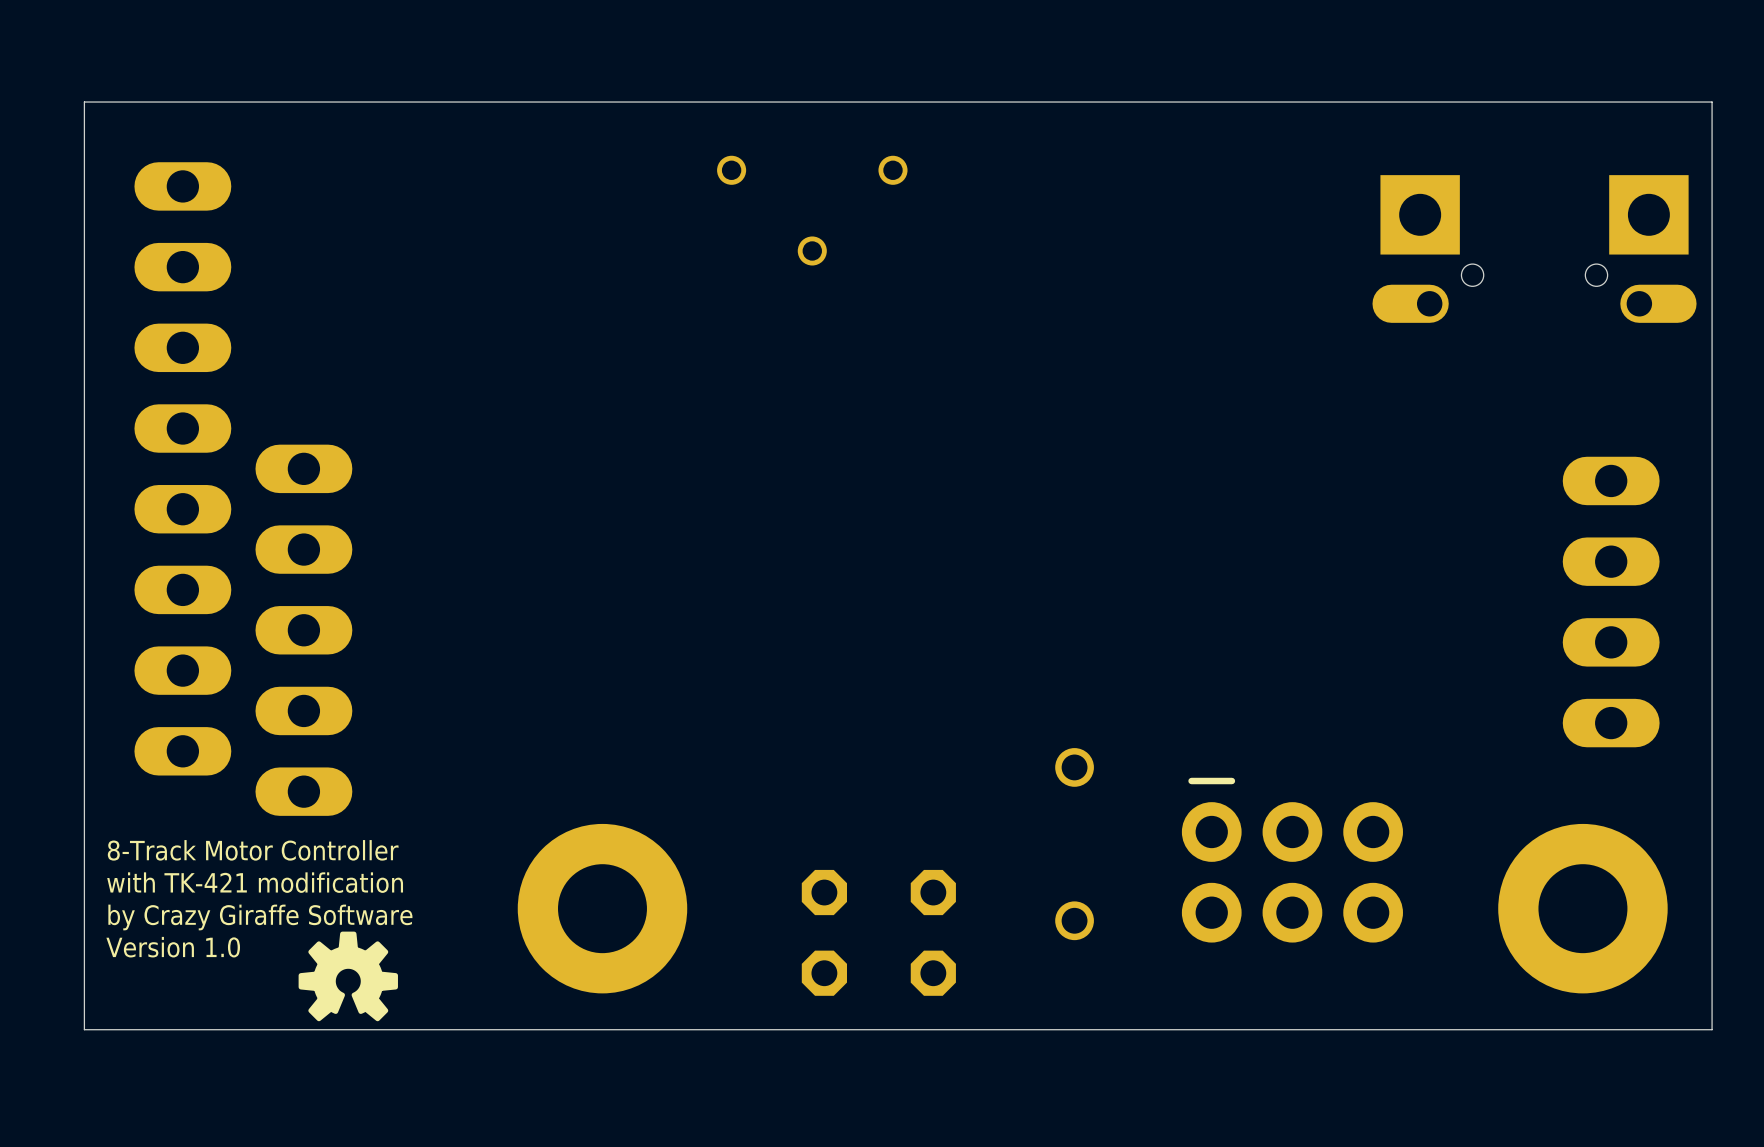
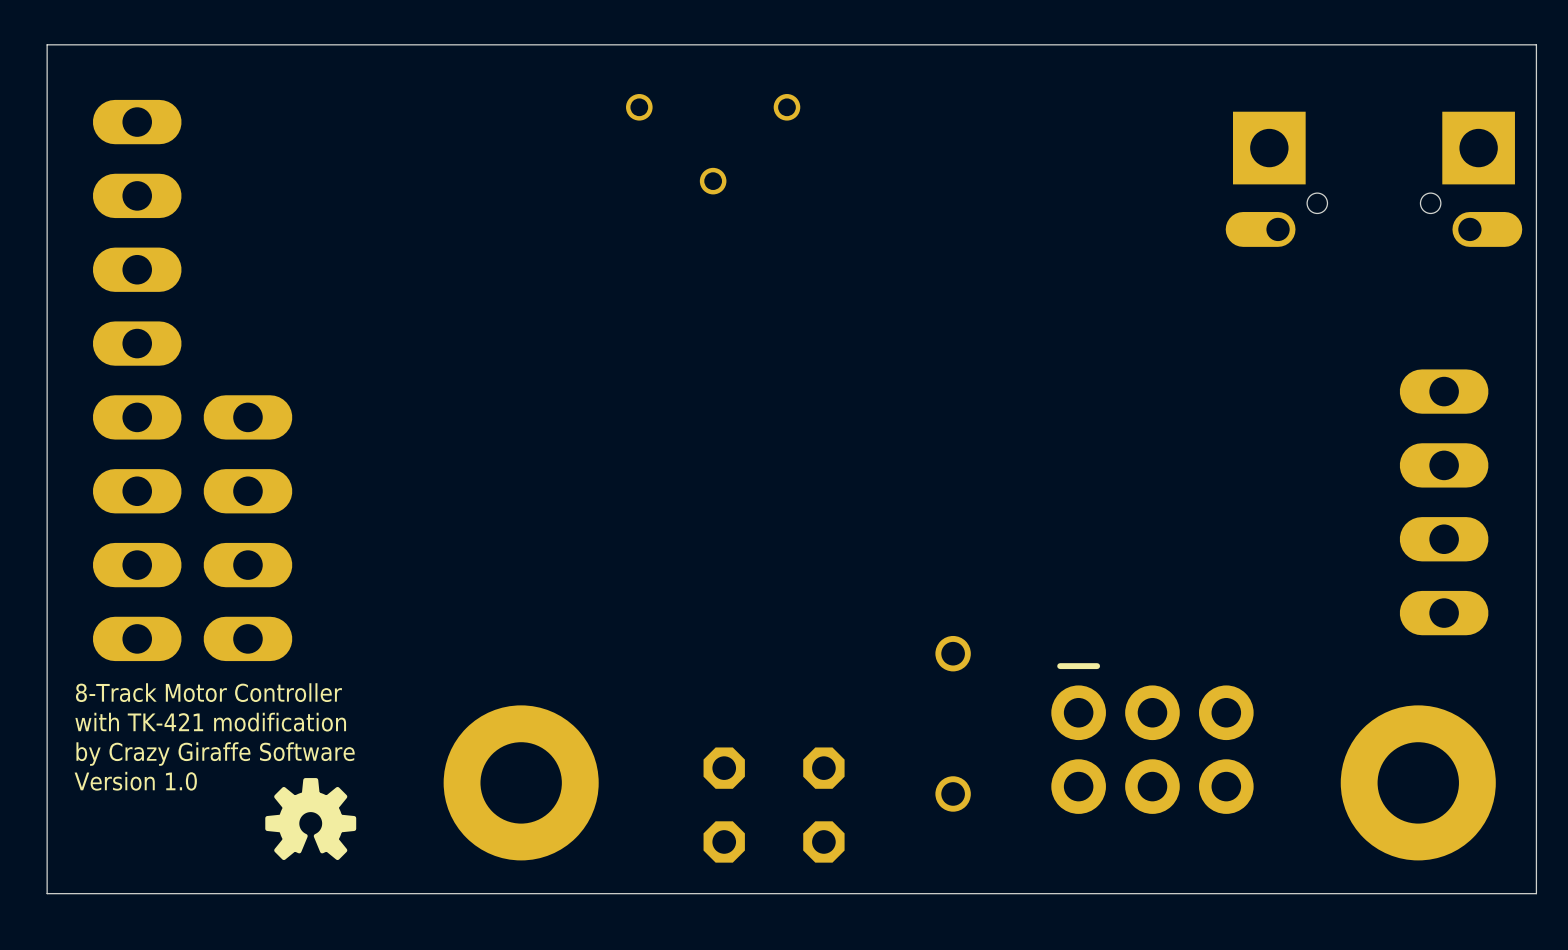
part footprint: [255, 444, 353, 816] -> [203, 395, 293, 662]
text: none -> 8-Track Motor Controller (208, 692)
text: 8-Track Motor Controller (253, 850) -> with TK-421 modification (210, 722)
text: with TK-421 modification (255, 882) -> by Crazy Giraffe Software (215, 754)
text: by Crazy Giraffe Software (260, 917) -> Version 1.0 (135, 781)
text: Version 1.0 (173, 947) -> none
drawing position: (348, 976) -> (310, 819)

